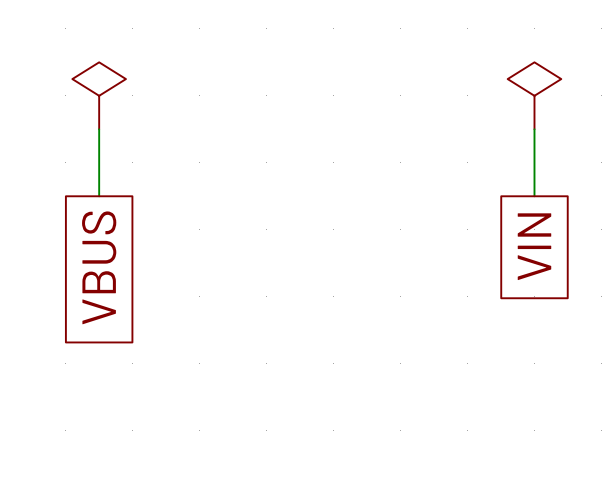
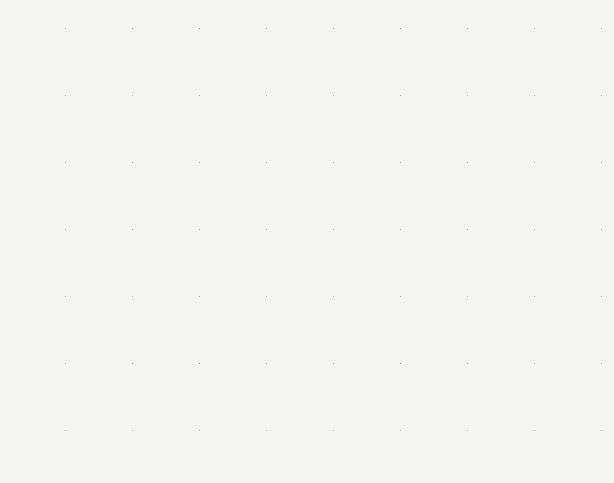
power symbol: (99, 95) -> none
power symbol: (534, 95) -> none
wire: (99, 129) (99, 196) -> none
wire: (534, 129) (534, 196) -> none
global label: VIN (534, 246) -> none
global label: VBUS (99, 267) -> none

